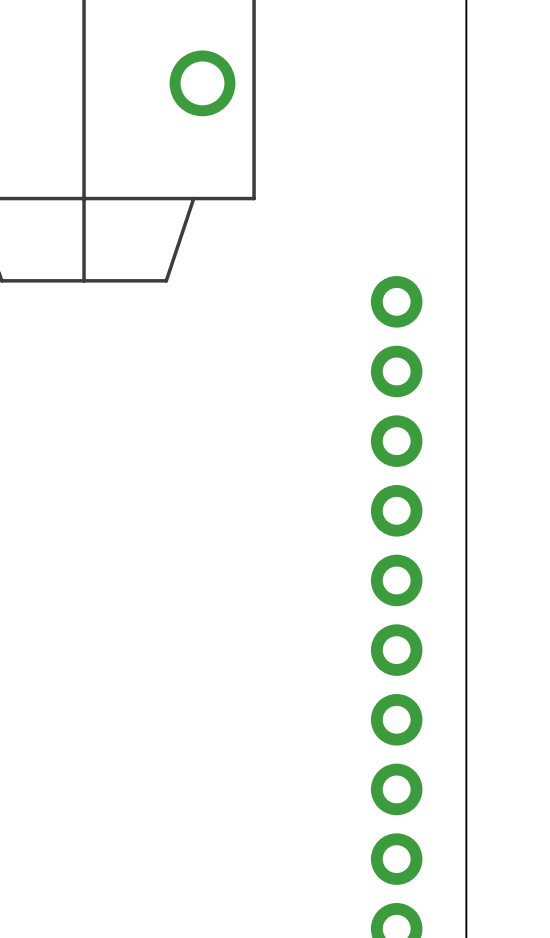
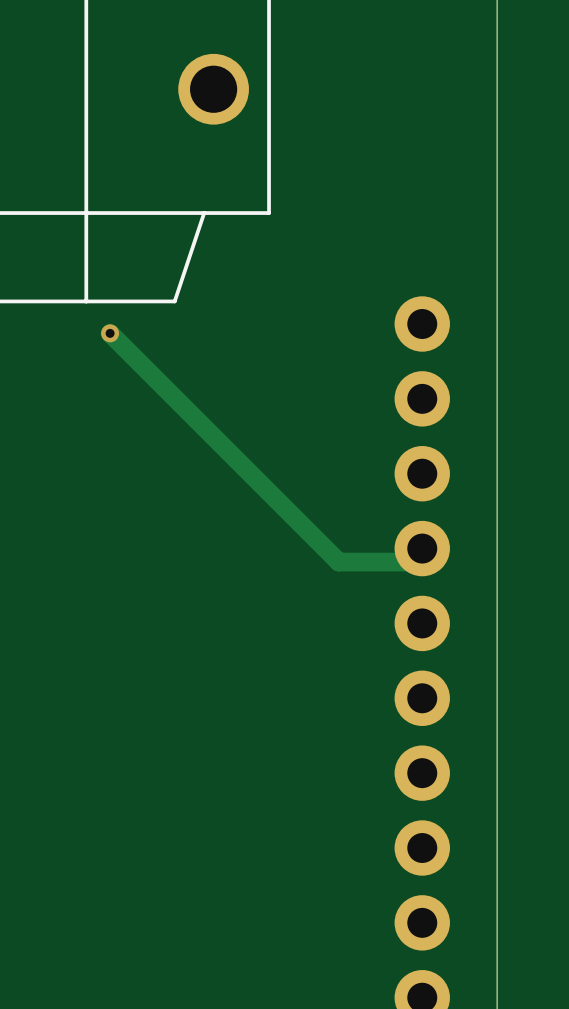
track: none -> (110, 333) (338, 562) (409, 562) (422, 548)
via: none -> (110, 333)

